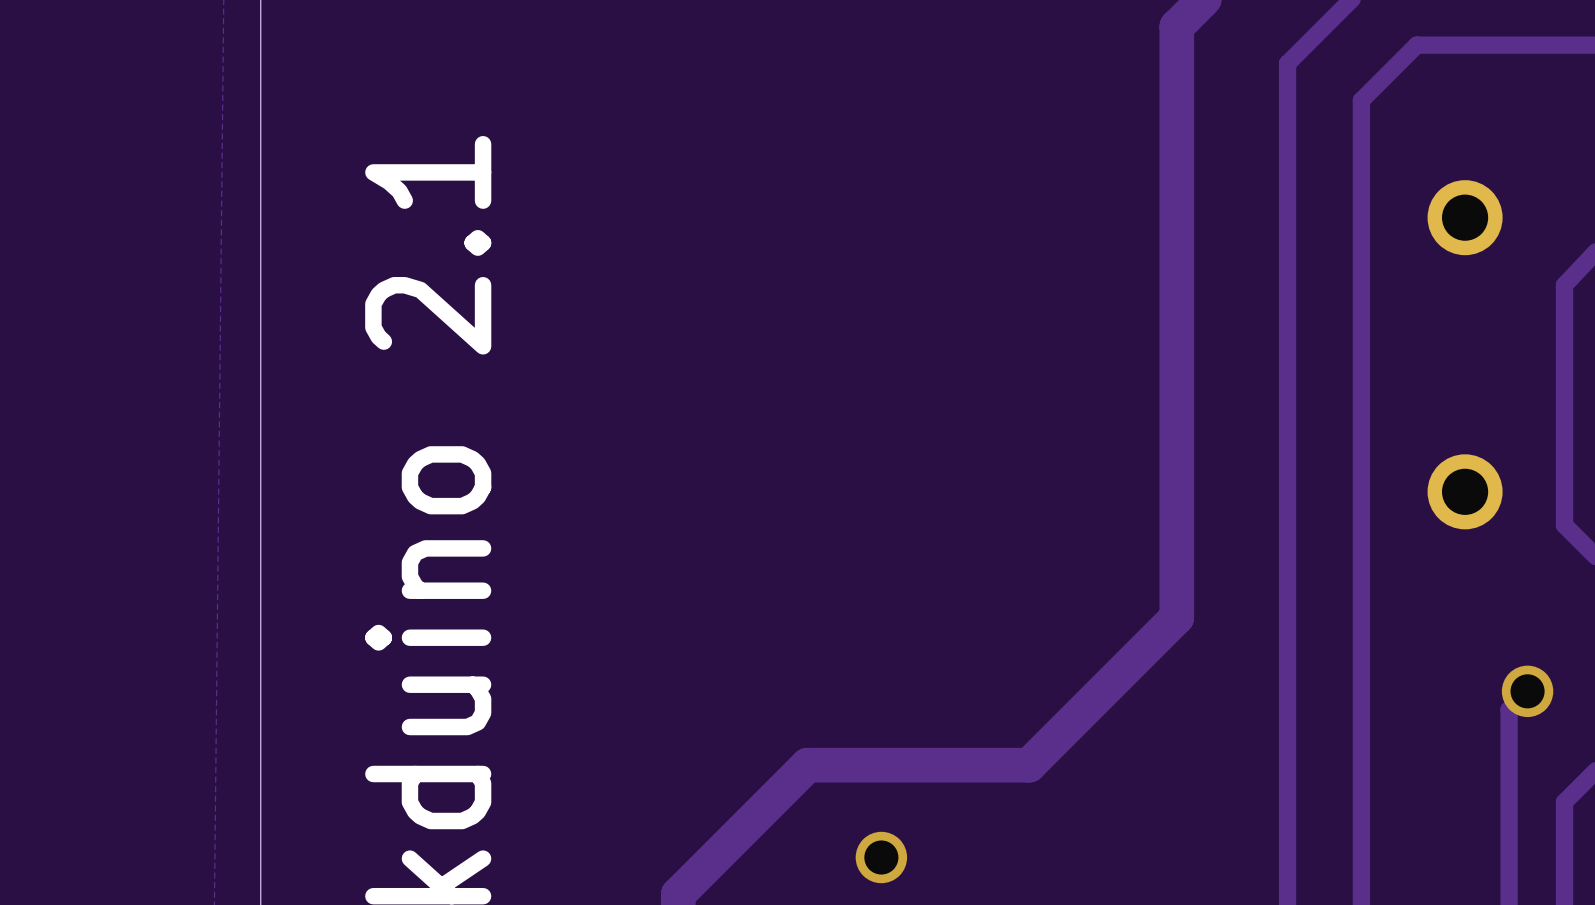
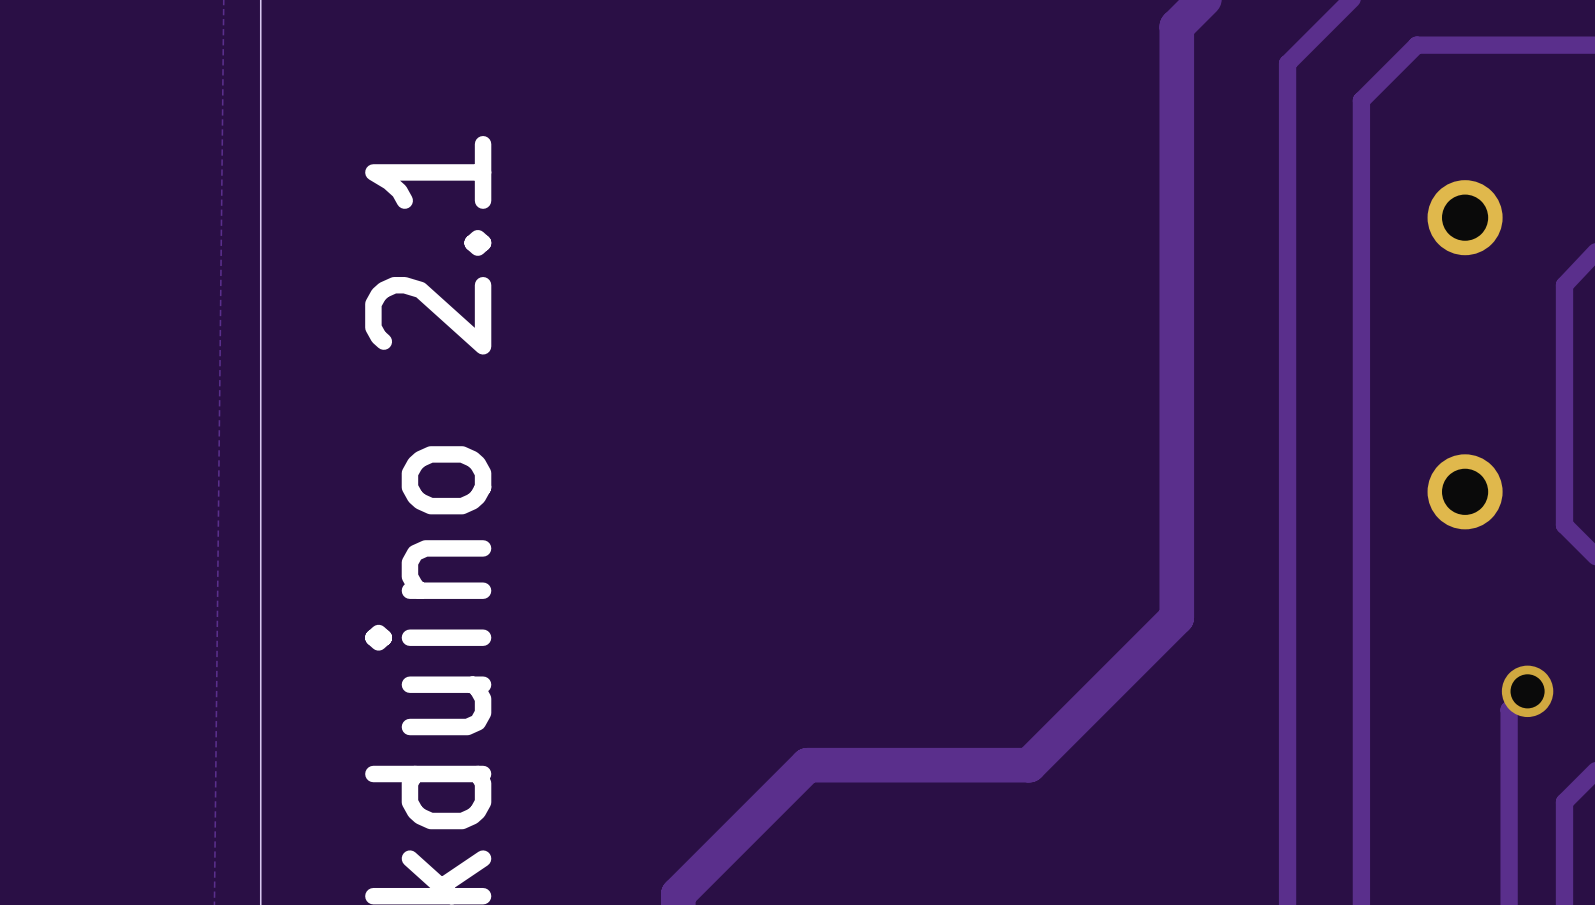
via: (881, 857) -> none

